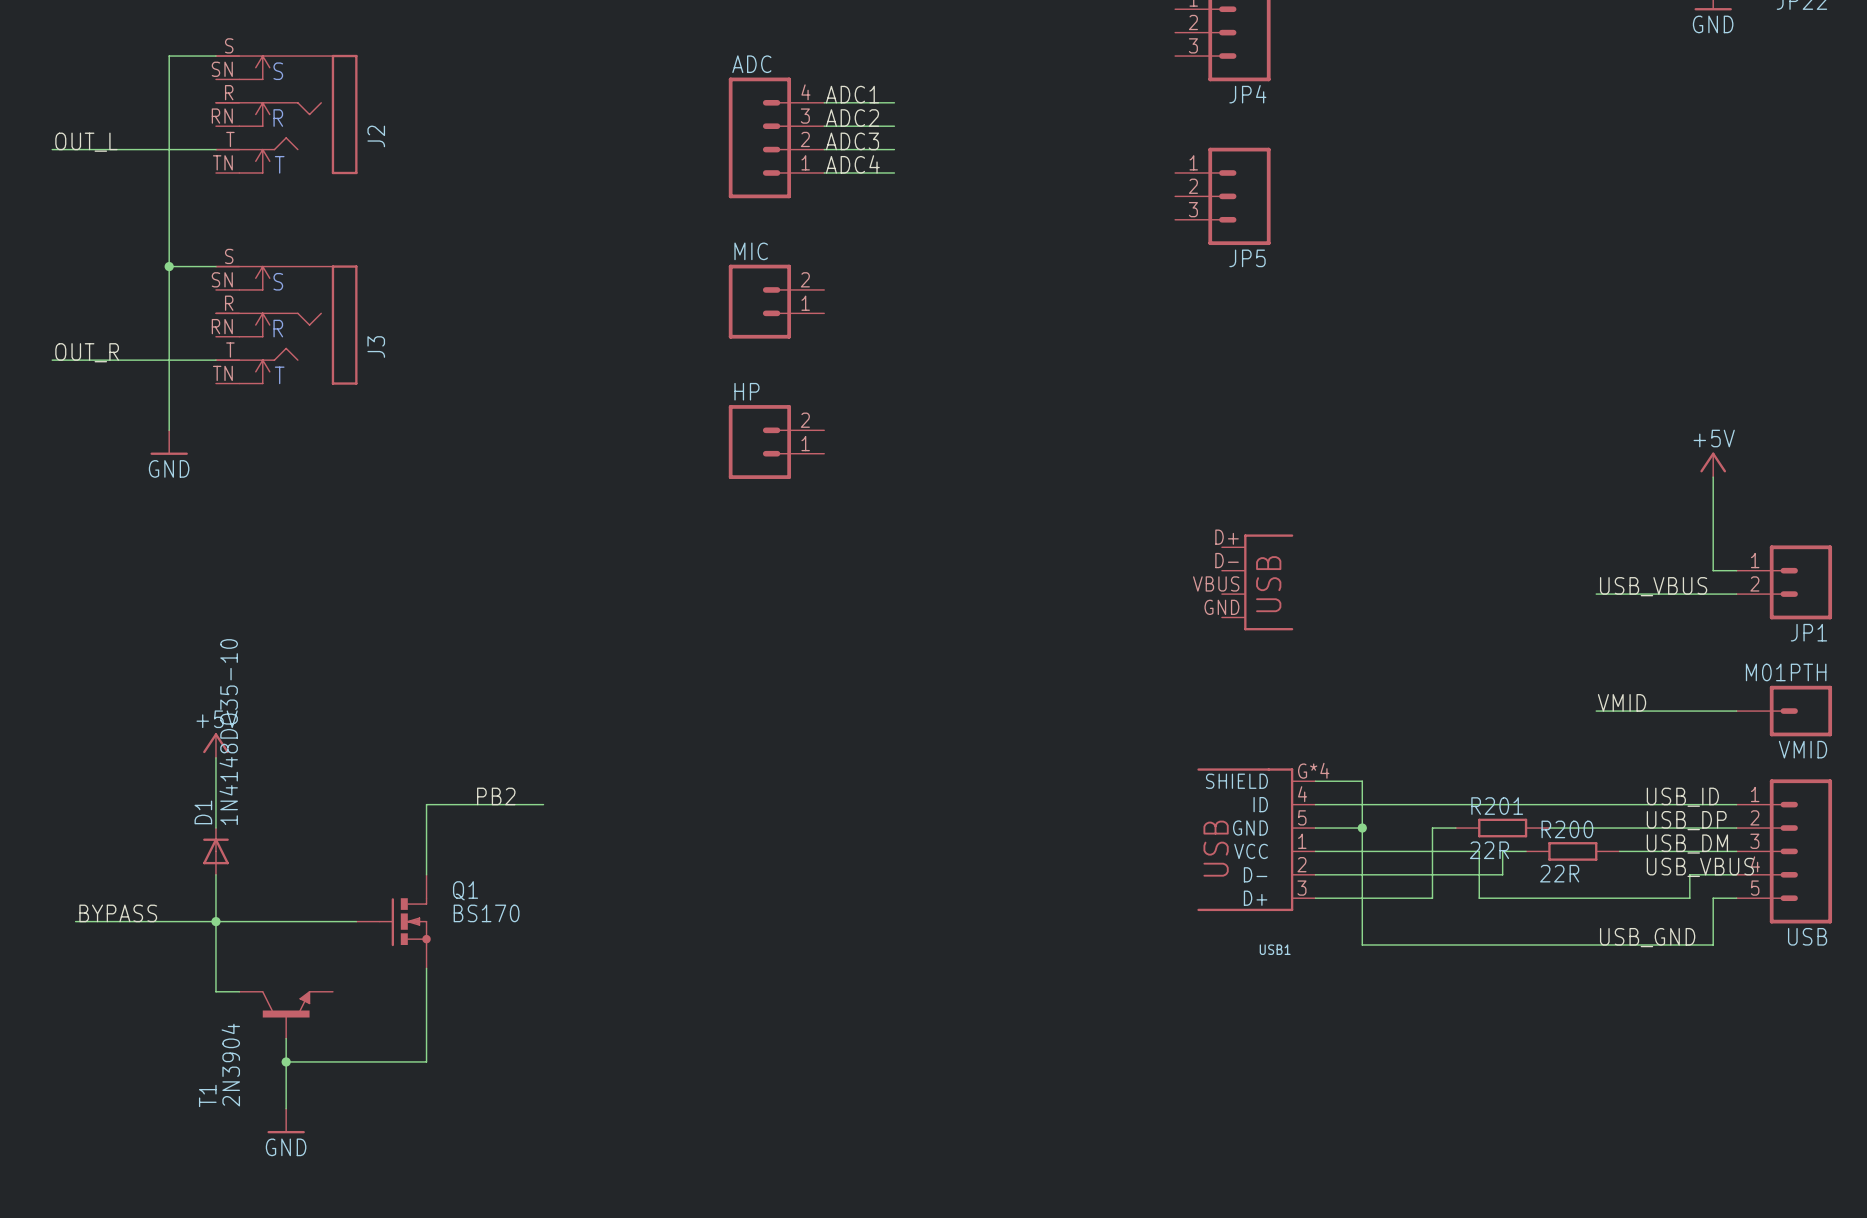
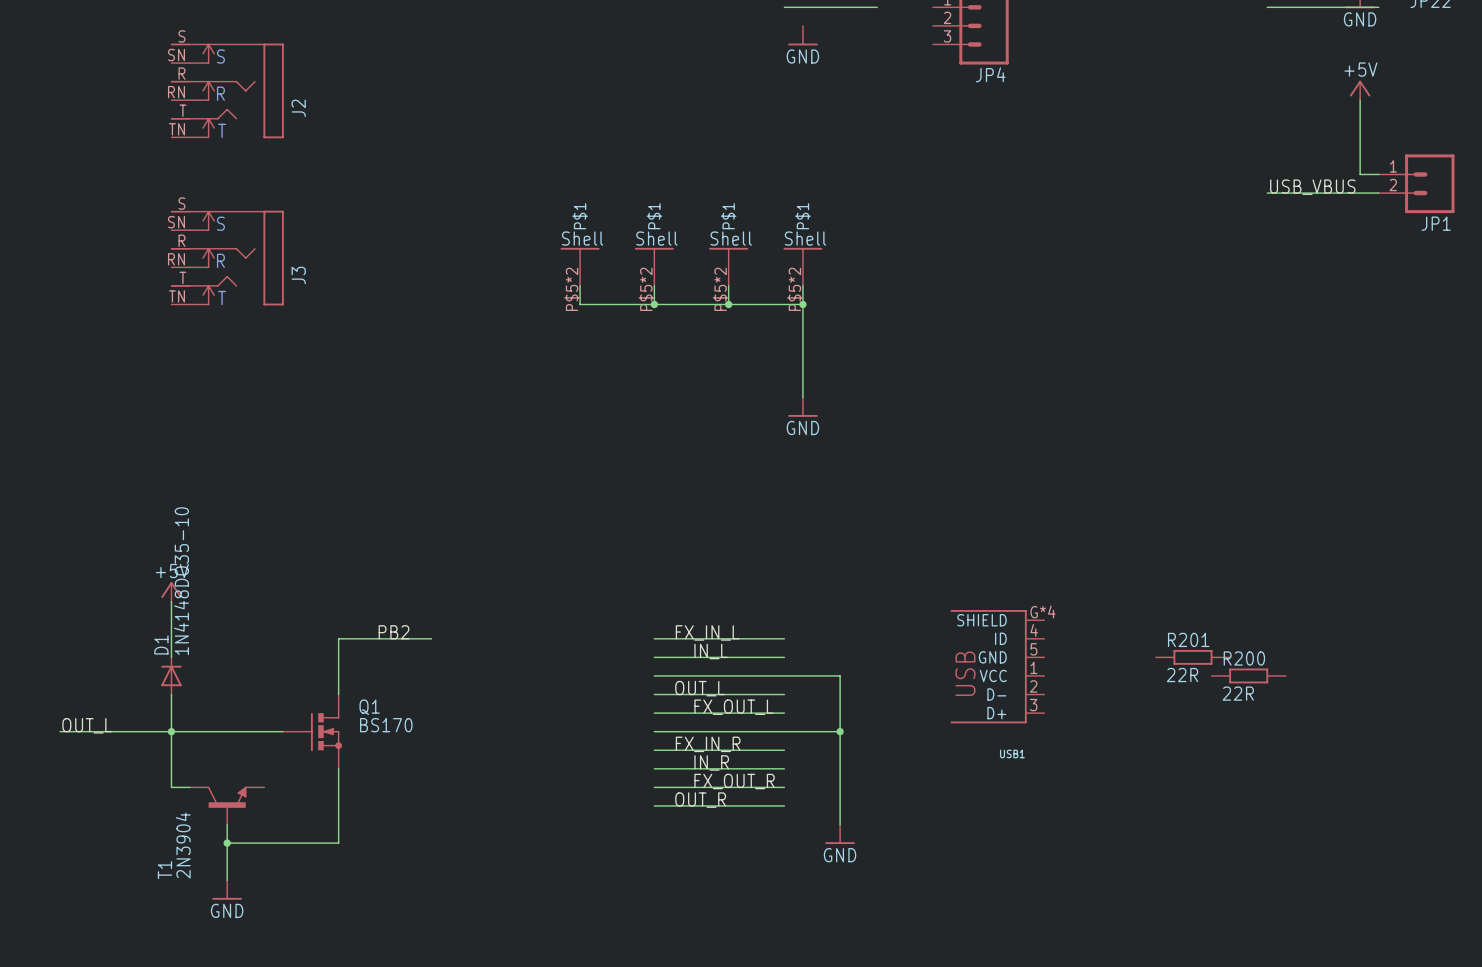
wire: none -> (784, 7) (877, 7)
wire: none -> (1267, 7) (1378, 7)
power symbol: none -> GND (802, 35)
wire: (215, 56) (169, 56) (169, 430) -> none
label: ADC1 (852, 94) -> none
wire: (824, 102) (894, 102) -> none
power symbol: none -> +5V (1360, 90)
label: ADC2 (852, 118) -> none
wire: (824, 126) (894, 126) -> none
wire: none -> (1360, 100) (1360, 174) (1378, 174)
ADC: (776, 137) -> none
label: ADC3 (852, 141) -> none
label: OUT_L (86, 142) -> none
wire: (52, 149) (215, 149) -> none
wire: (824, 149) (894, 149) -> none
label: ADC4 (852, 164) -> none
wire: (824, 172) (894, 172) -> none
JP5: (1222, 196) -> none
label: none -> USB_VBUS (1312, 187)
wire: none -> (1267, 193) (1378, 193)
wire: (169, 266) (215, 266) -> none
junction: (169, 266) -> none
MIC: (776, 301) -> none
part: none -> (580, 266)
part: none -> (654, 266)
part: none -> (728, 266)
part: none -> (802, 266)
label: OUT_R (87, 352) -> none
wire: (52, 360) (215, 360) -> none
wire: none -> (580, 285) (580, 304) (802, 304)
wire: none -> (654, 285) (654, 304)
wire: none -> (728, 285) (728, 304)
wire: none -> (802, 285) (802, 397)
junction: none -> (654, 304)
junction: none -> (728, 304)
junction: none -> (802, 304)
power symbol: GND (169, 442) -> none
HP: (776, 442) -> none
power symbol: +5V (1713, 464) -> none
wire: (1713, 477) (1713, 570) (1736, 570) -> none
power symbol: none -> GND (802, 407)
part: (1257, 582) -> none
JP1 position: (1784, 582) -> (1416, 183)
label: USB_VBUS (1653, 586) -> none
wire: (1596, 594) (1736, 594) -> none
label: VMID (1622, 702) -> none
wire: (1596, 711) (1736, 711) -> none
VMID: M01PTH (1784, 711) -> none
wire: (1315, 781) (1362, 781) (1362, 944) (1713, 944) (1713, 898) (1736, 898) -> none
label: none -> FX_IN_L (707, 632)
label: USB_ID (1682, 797) -> none
wire: none -> (654, 638) (784, 638)
wire: (1315, 804) (1736, 804) -> none
label: none -> IN_L (711, 651)
label: USB_DP (1686, 820) -> none
wire: none -> (654, 657) (784, 657)
wire: (1315, 828) (1362, 828) -> none
junction: (1362, 828) -> none
wire: (1455, 828) (1432, 828) (1432, 898) (1315, 898) -> none
wire: (1549, 828) (1736, 828) -> none
label: USB_DM (1687, 844) -> none
wire: none -> (654, 675) (840, 675) (840, 824)
wire: (1315, 851) (1479, 851) (1479, 898) (1689, 898) (1689, 874) (1736, 874) -> none
wire: (1526, 851) (1502, 851) (1502, 874) (1315, 874) -> none
wire: (1619, 851) (1736, 851) -> none
USB: (1784, 851) -> none
label: none -> OUT_L (700, 688)
label: USB_VBUS (1700, 867) -> none
wire: none -> (654, 694) (784, 694)
label: none -> FX_OUT_L (733, 707)
wire: none -> (654, 713) (784, 713)
label: BYPASS (118, 913) -> OUT_L (87, 725)
wire: none -> (654, 731) (840, 731)
junction: none -> (840, 731)
label: none -> FX_IN_R (708, 744)
label: USB_GND (1647, 937) -> none
wire: none -> (654, 750) (784, 750)
label: none -> IN_R (711, 762)
wire: none -> (654, 768) (784, 768)
label: none -> FX_OUT_R (734, 781)
wire: none -> (654, 787) (784, 787)
label: none -> OUT_R (700, 800)
wire: none -> (654, 805) (784, 805)
power symbol: none -> GND (840, 834)

